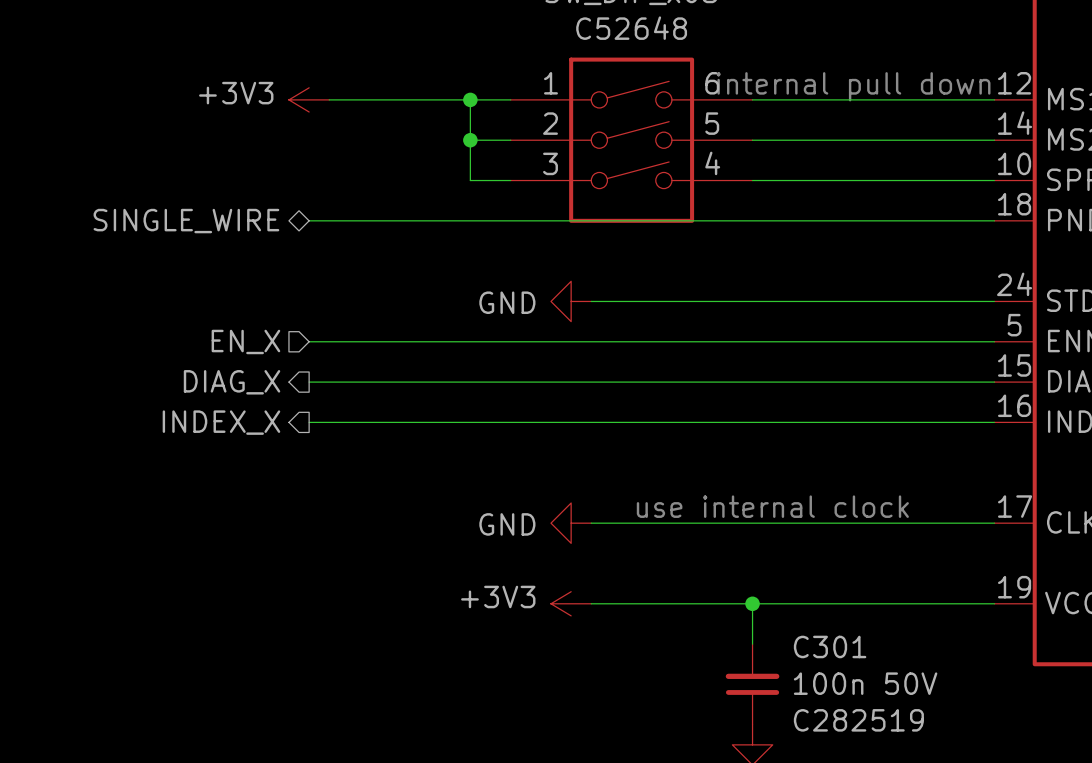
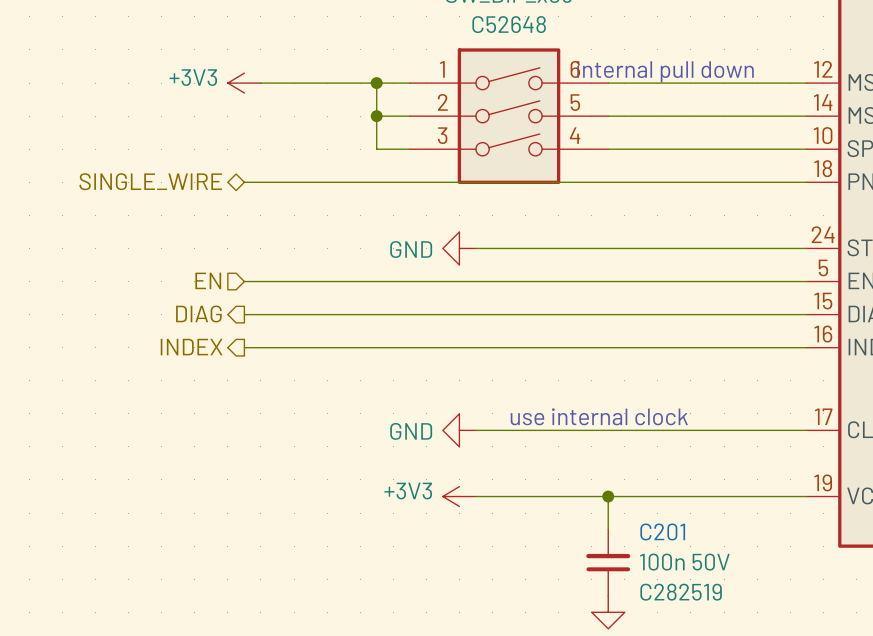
hierarchical label: EN_X (245, 341) -> EN (208, 280)
hierarchical label: DIAG_X (232, 382) -> DIAG (198, 313)
hierarchical label: INDEX_X (221, 422) -> INDEX (191, 347)
C301 name: C301 (830, 646) -> C201 (662, 531)

